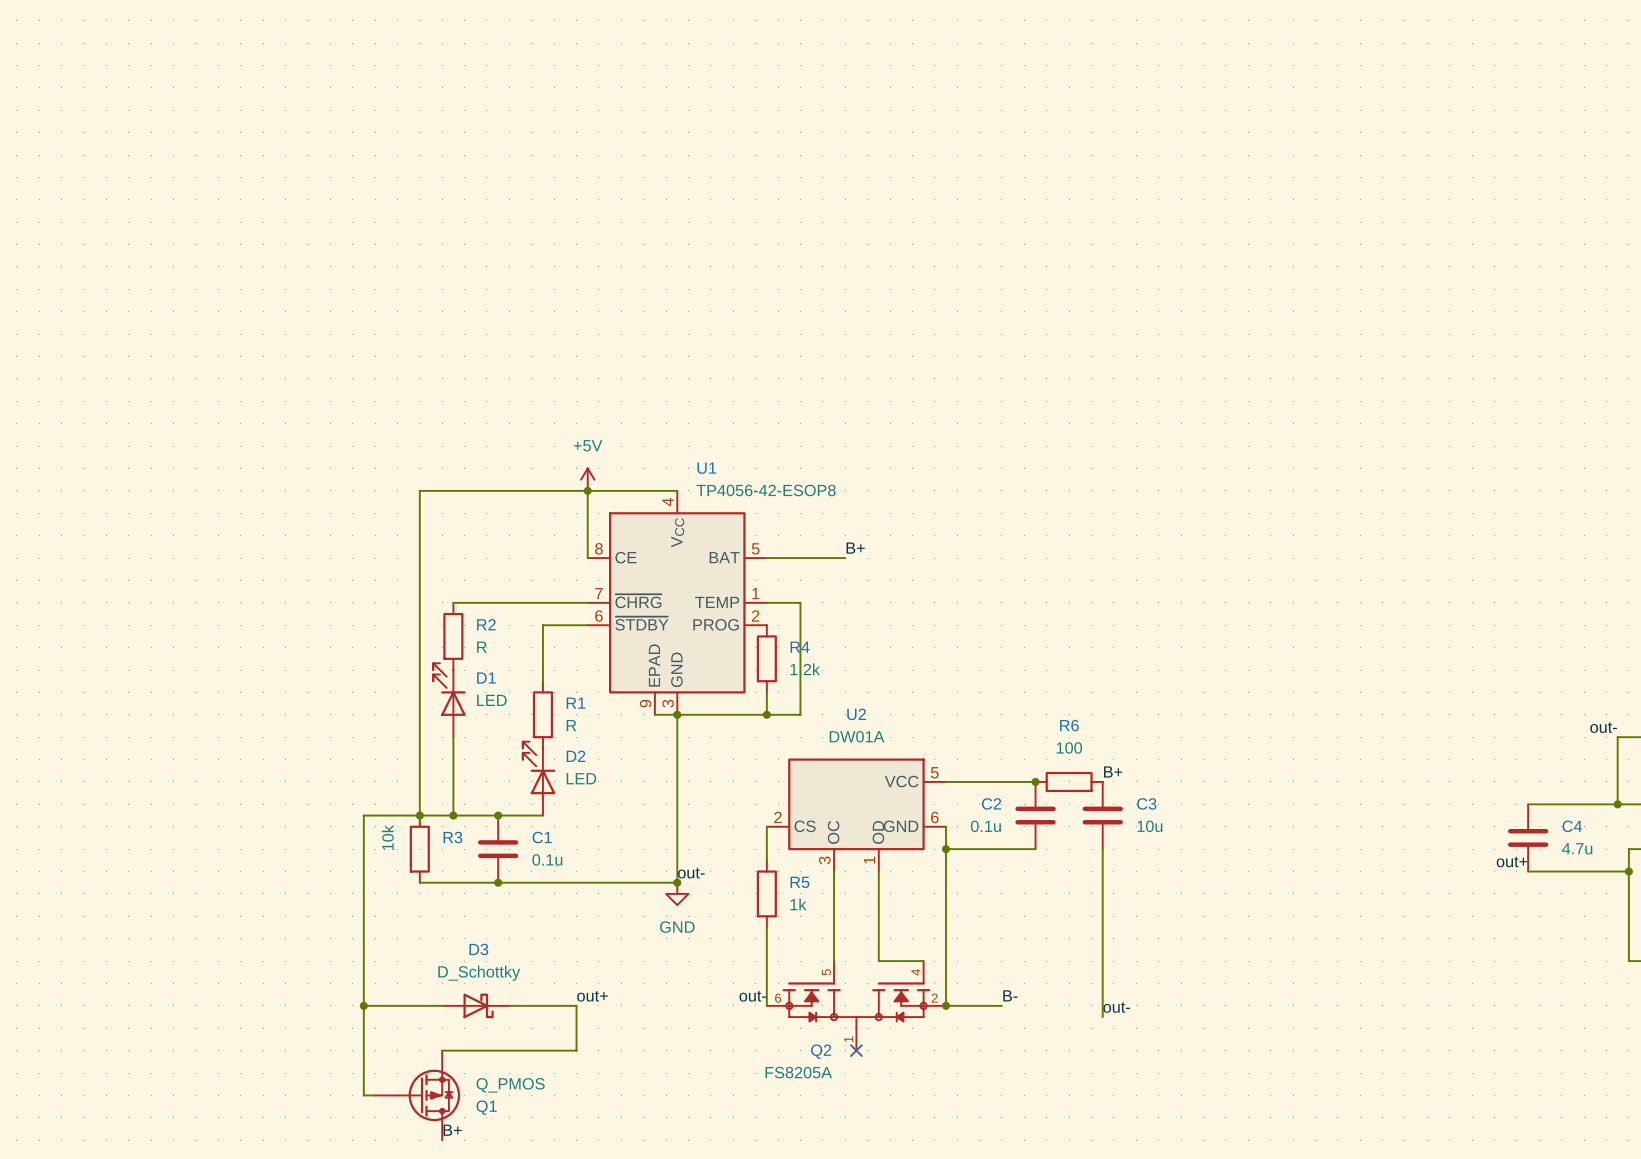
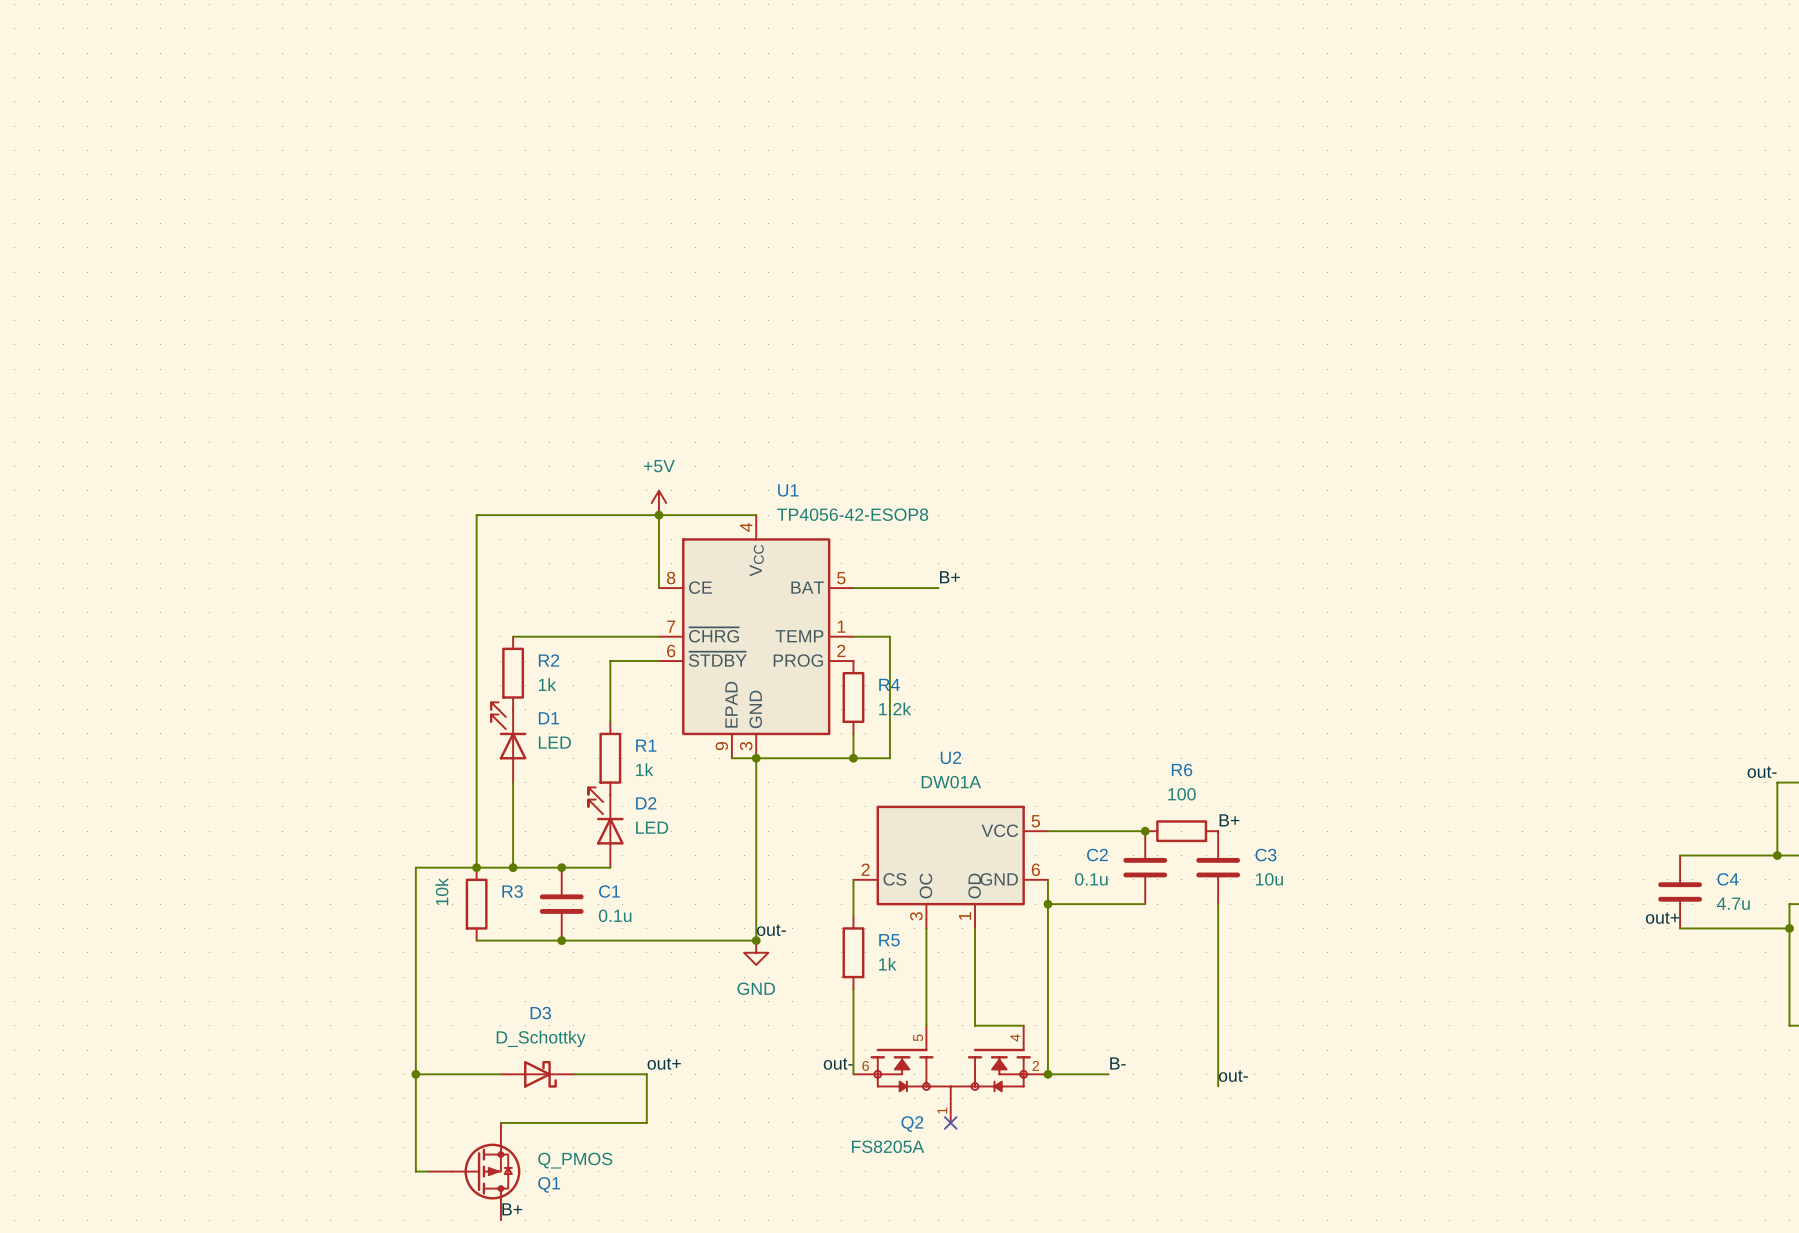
R2 value: R (481, 647) -> 1k (547, 684)
R1 value: R (571, 725) -> 1k (644, 769)

